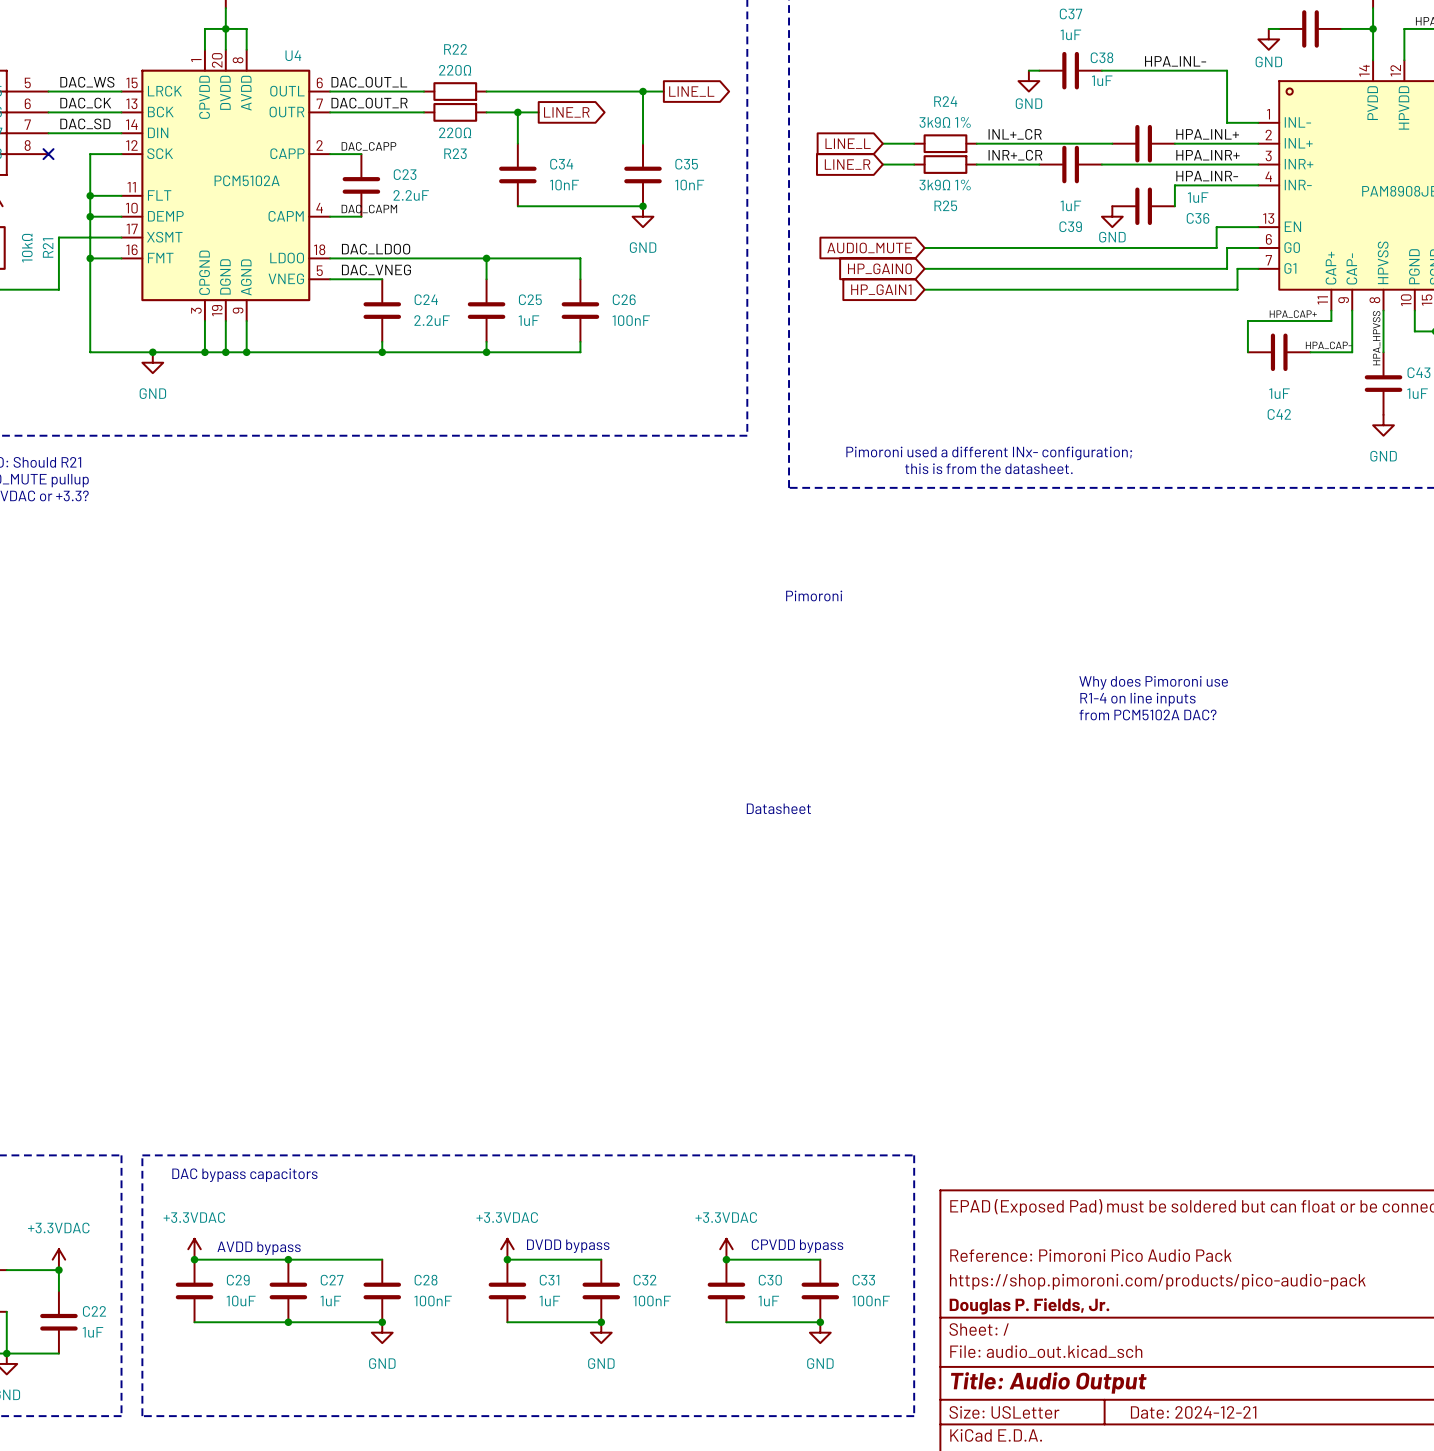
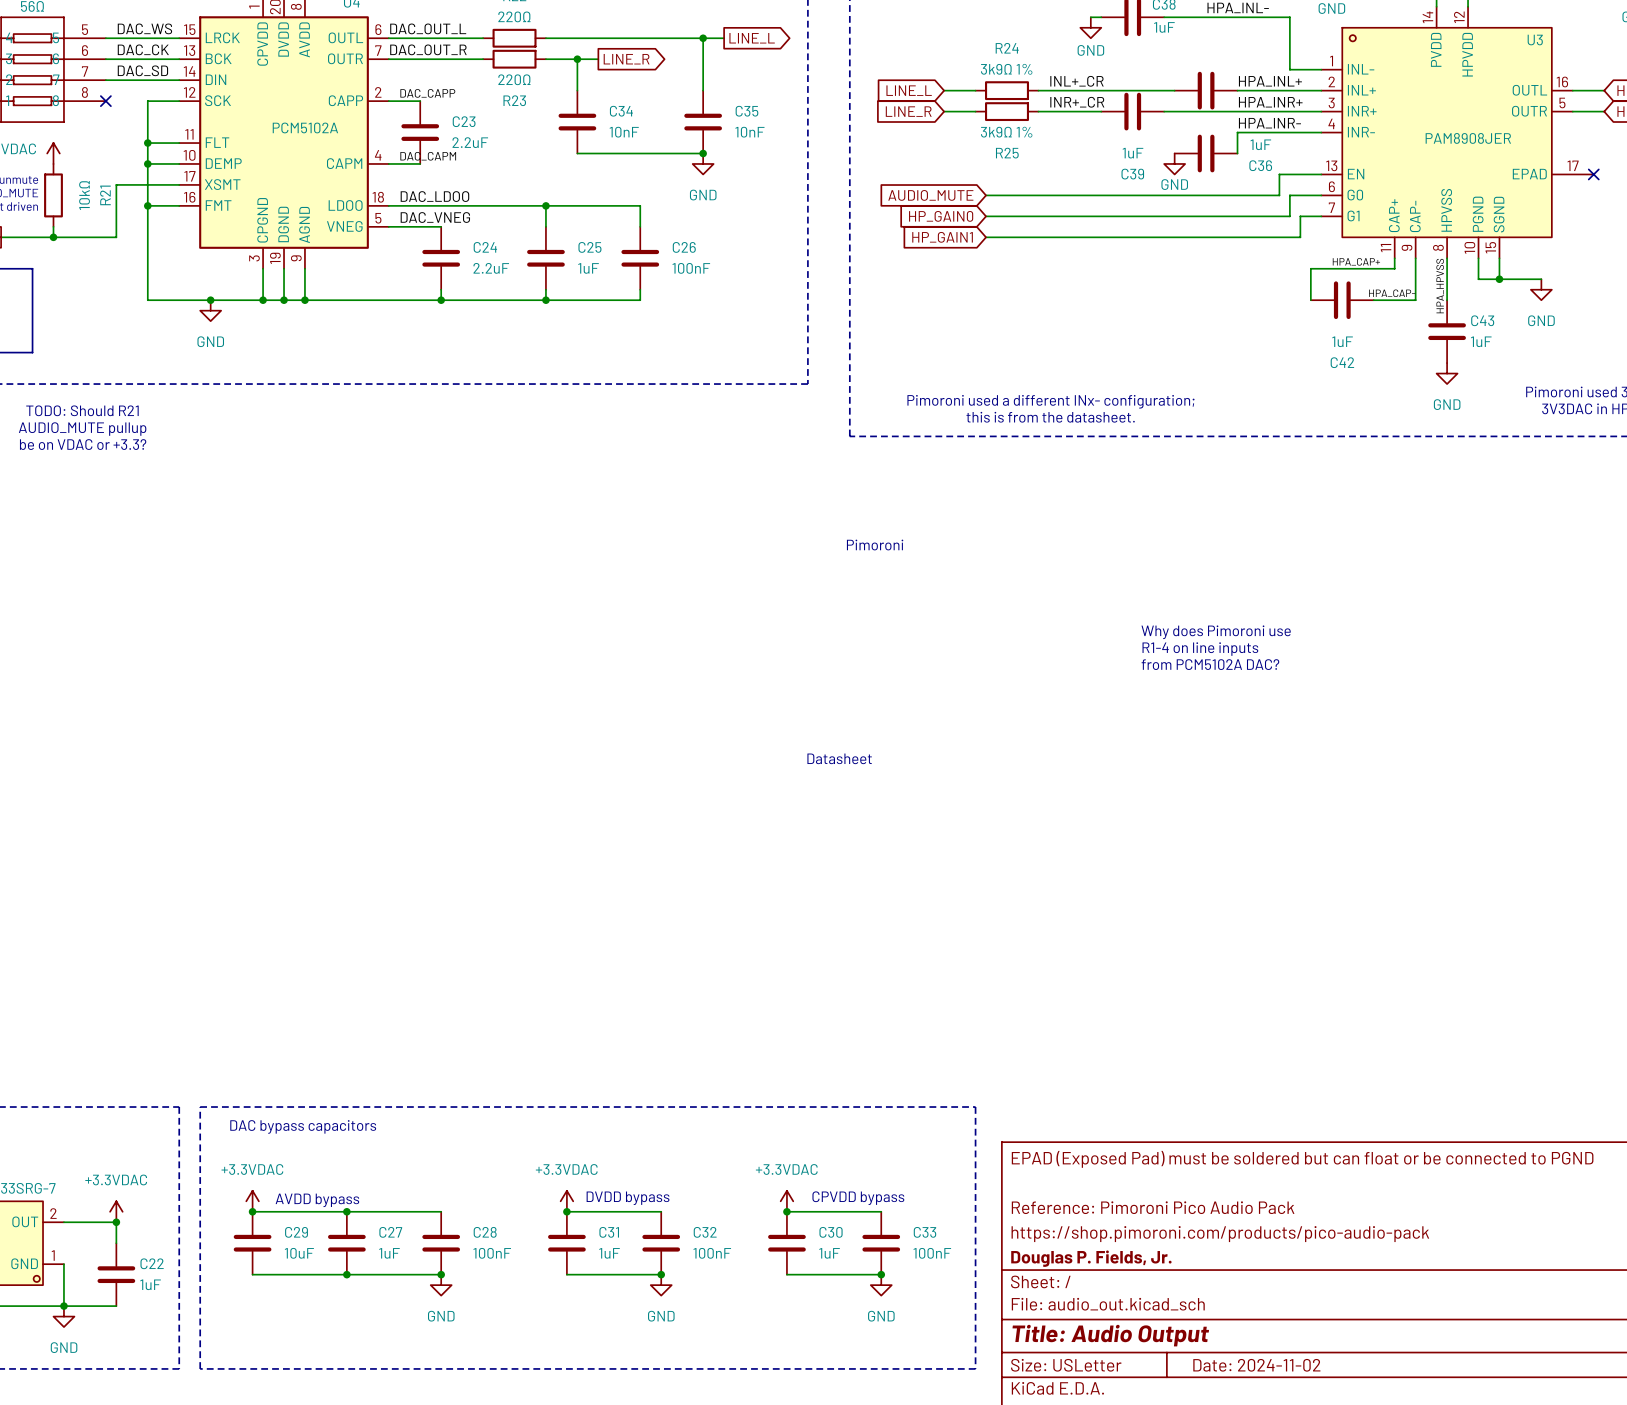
title block: Date: 2024-12-21 (1193, 1412) -> Date: 2024-11-02 (1256, 1365)

